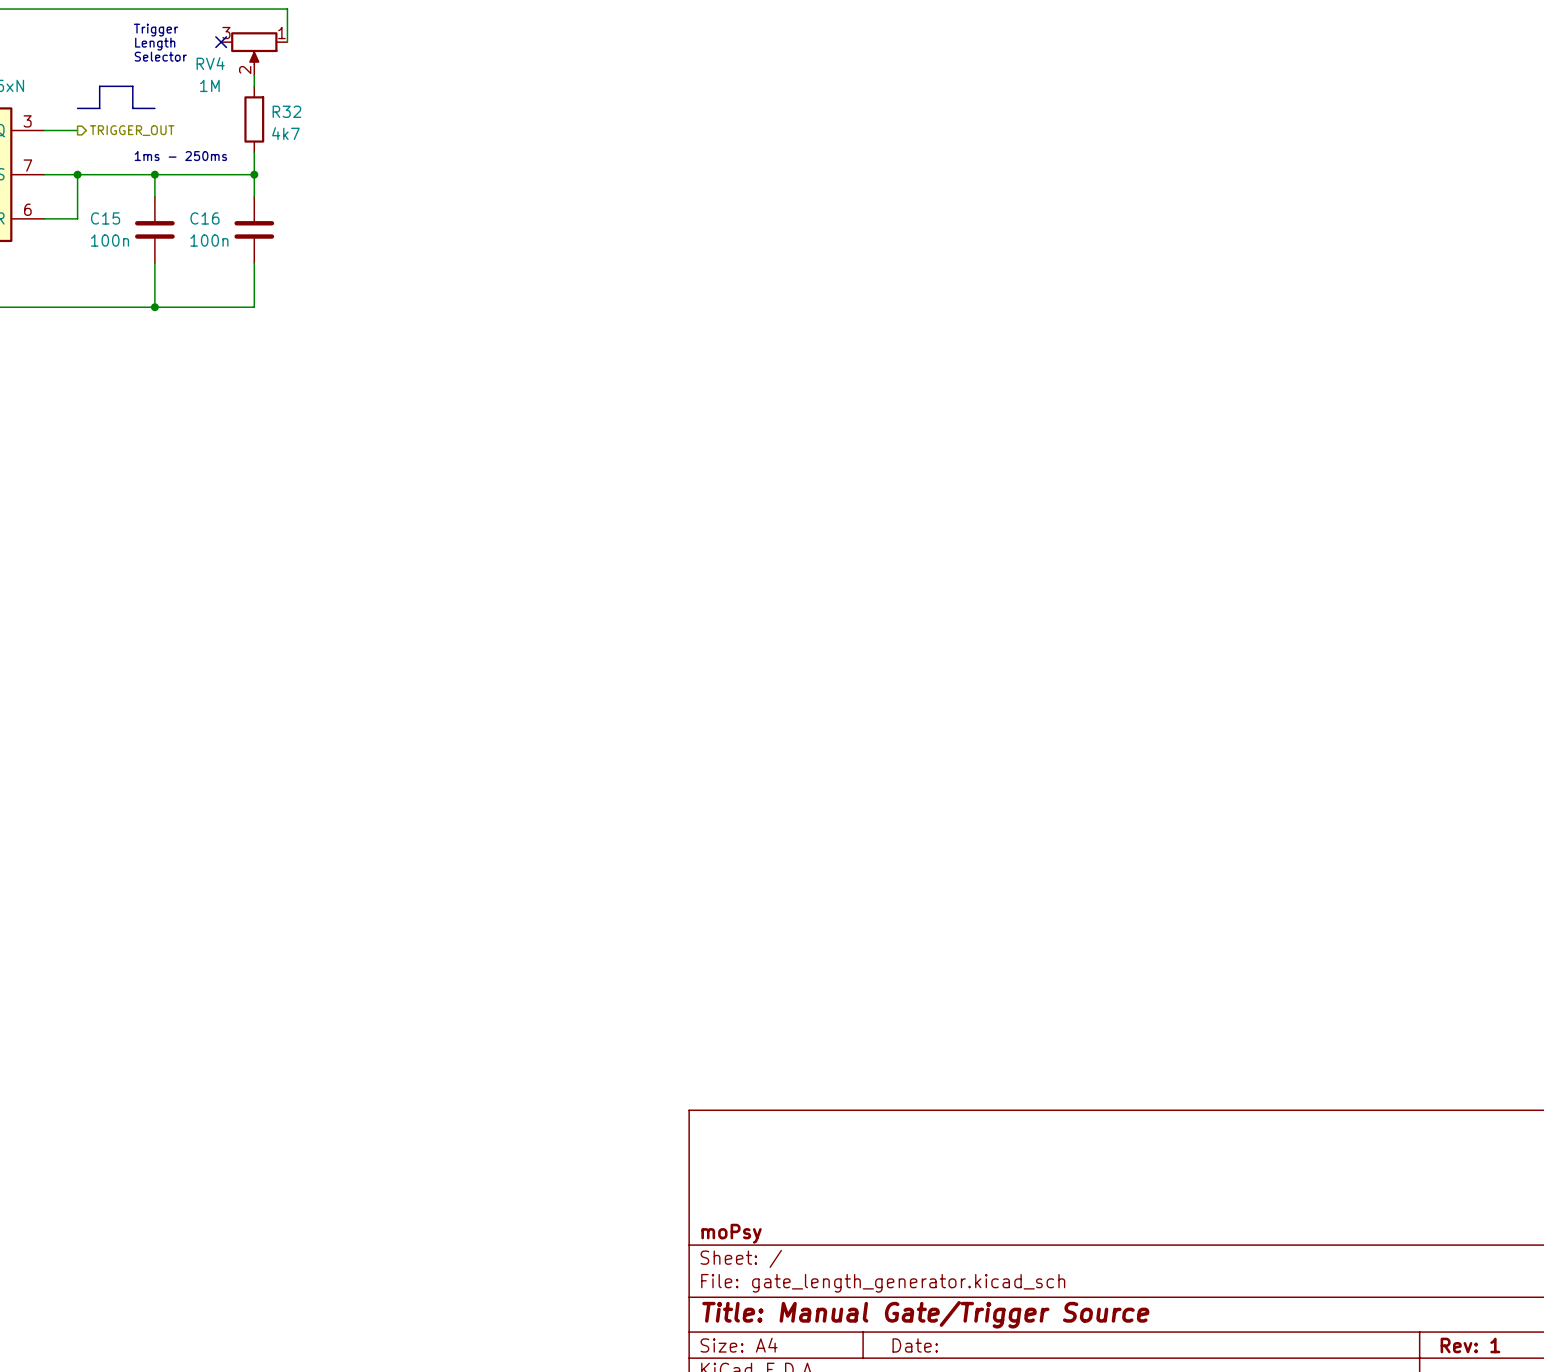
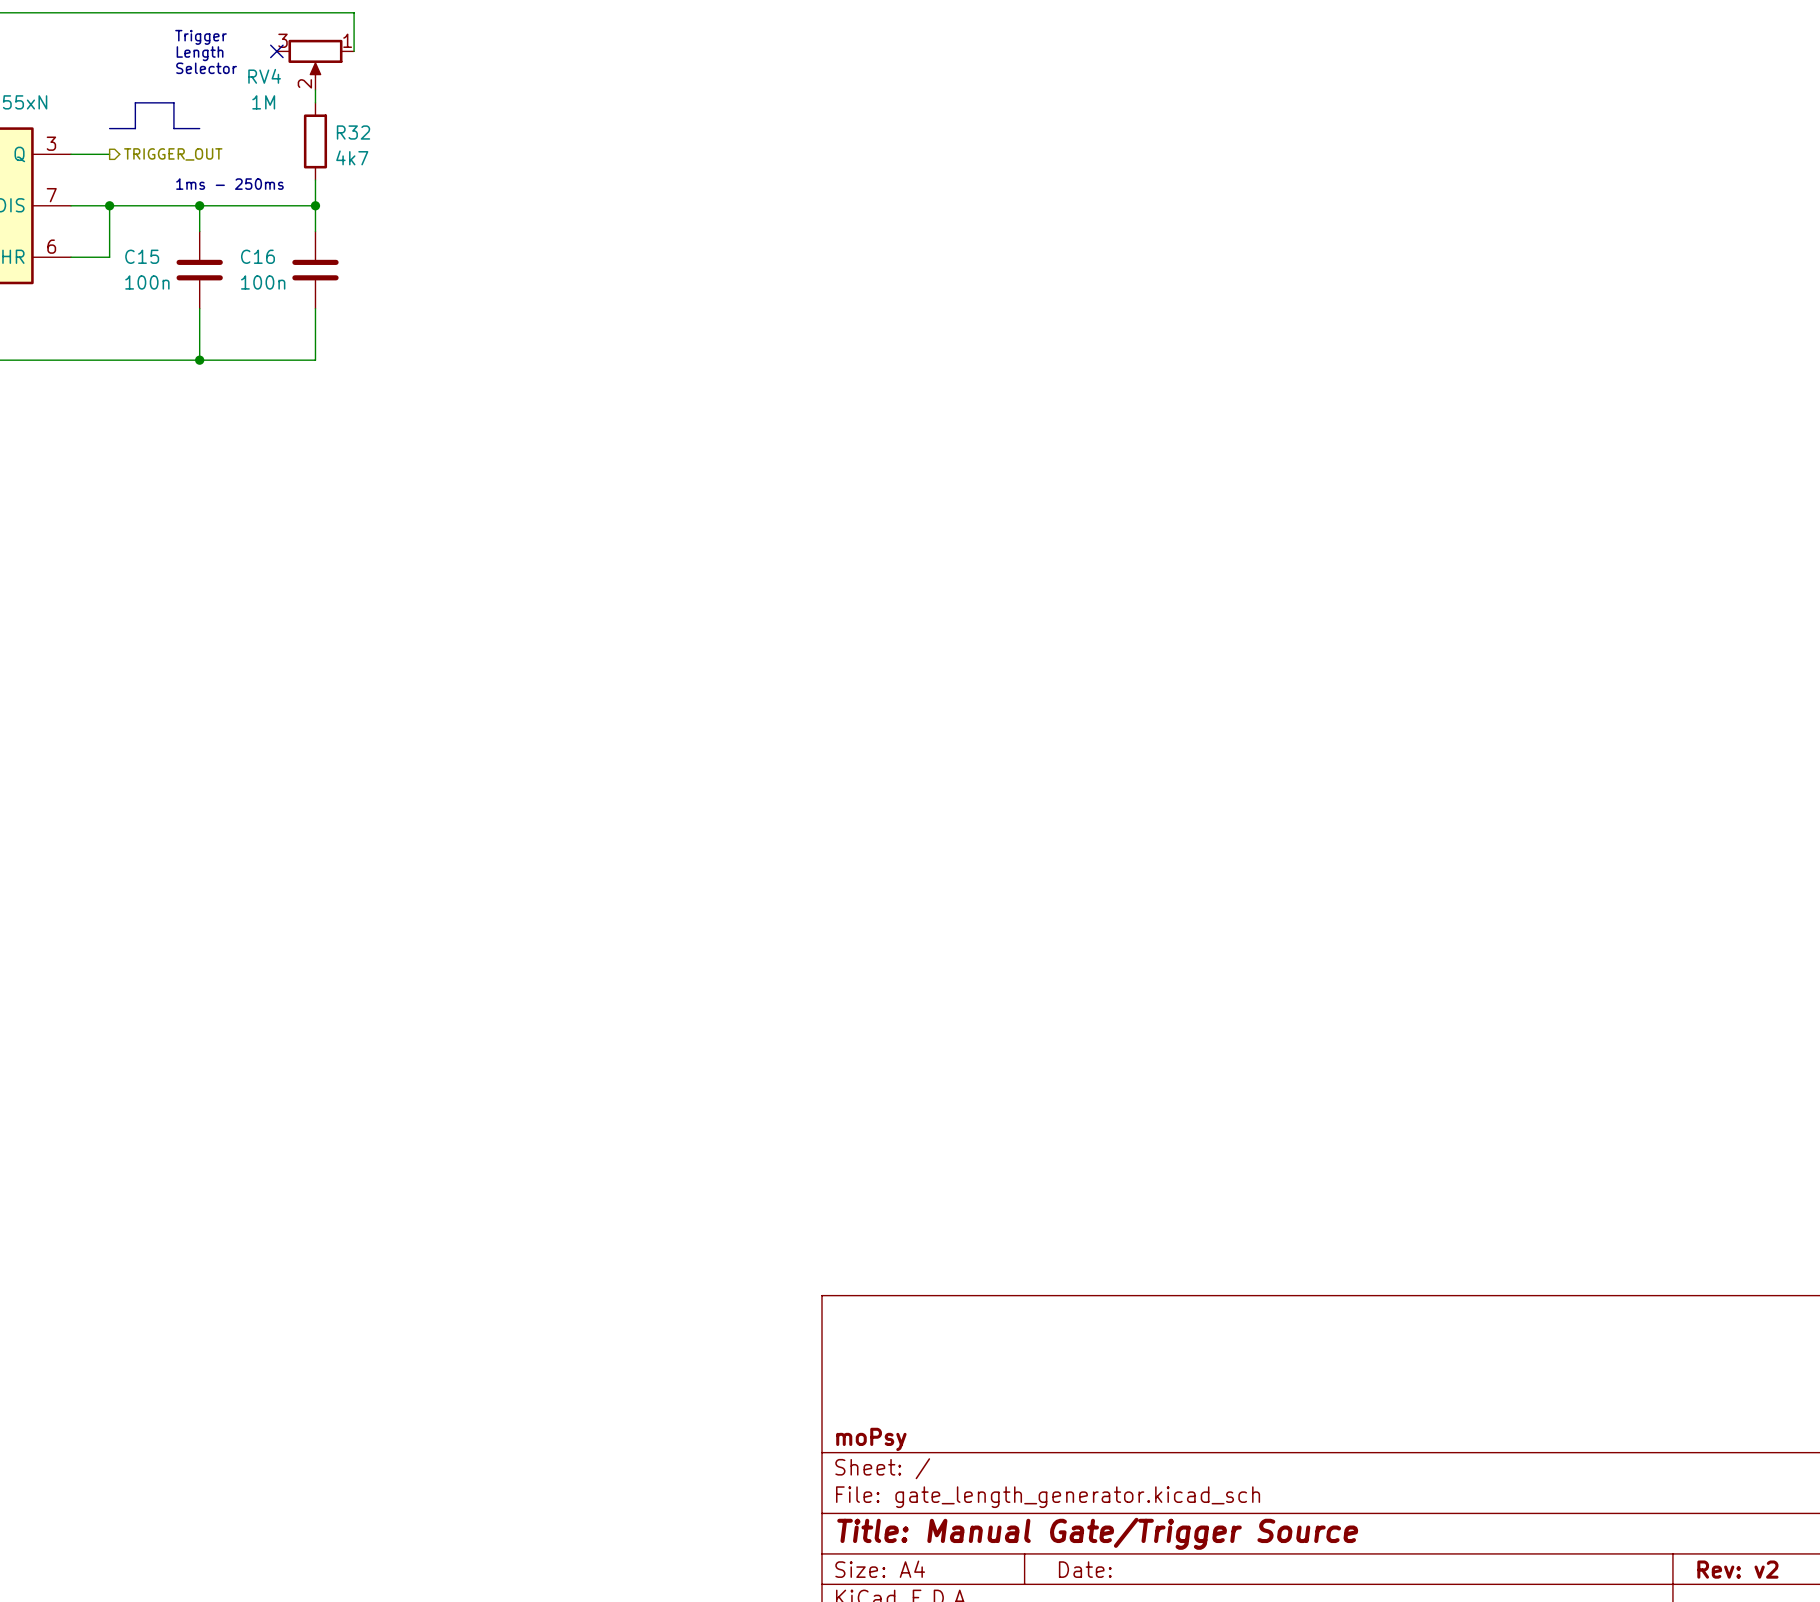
title block: Rev: 1 (1470, 1345) -> Rev: v2 (1737, 1569)

